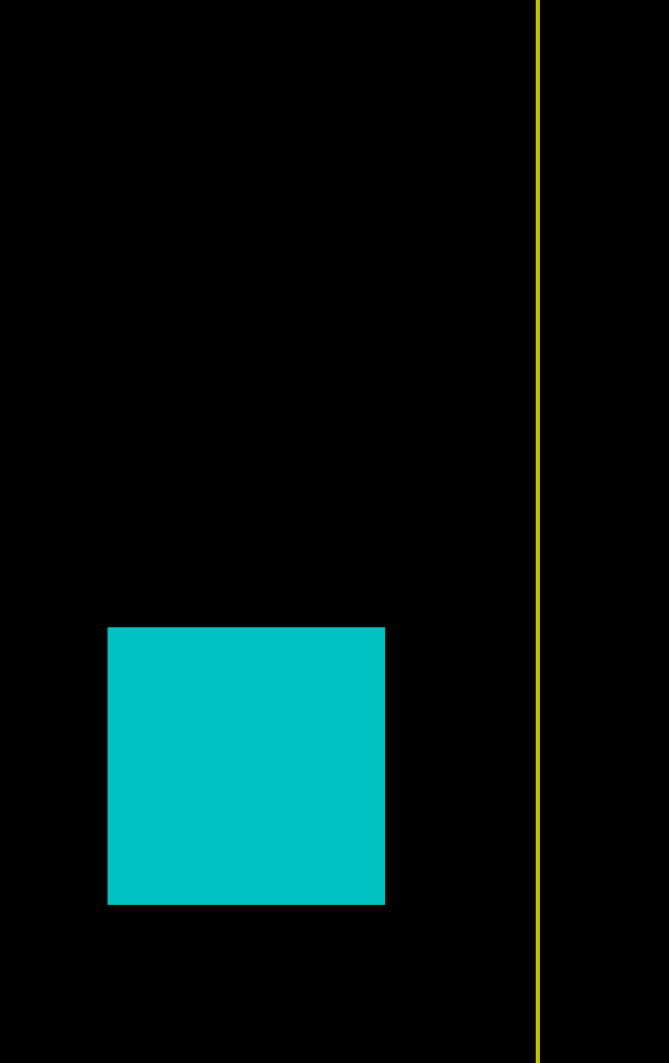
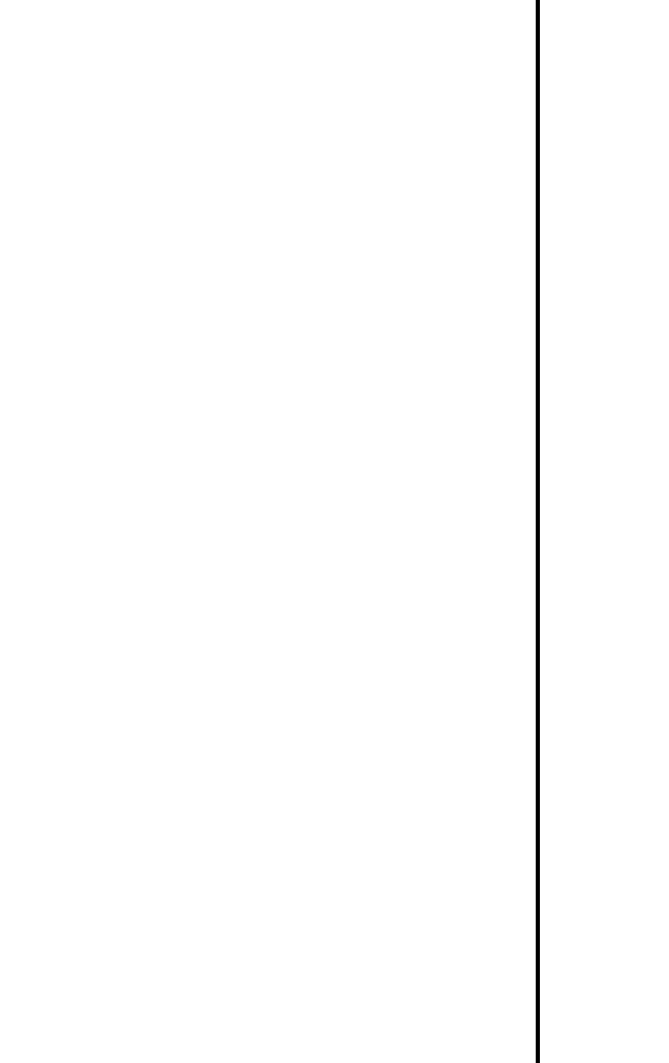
drawing: [107, 627, 386, 905] -> none

